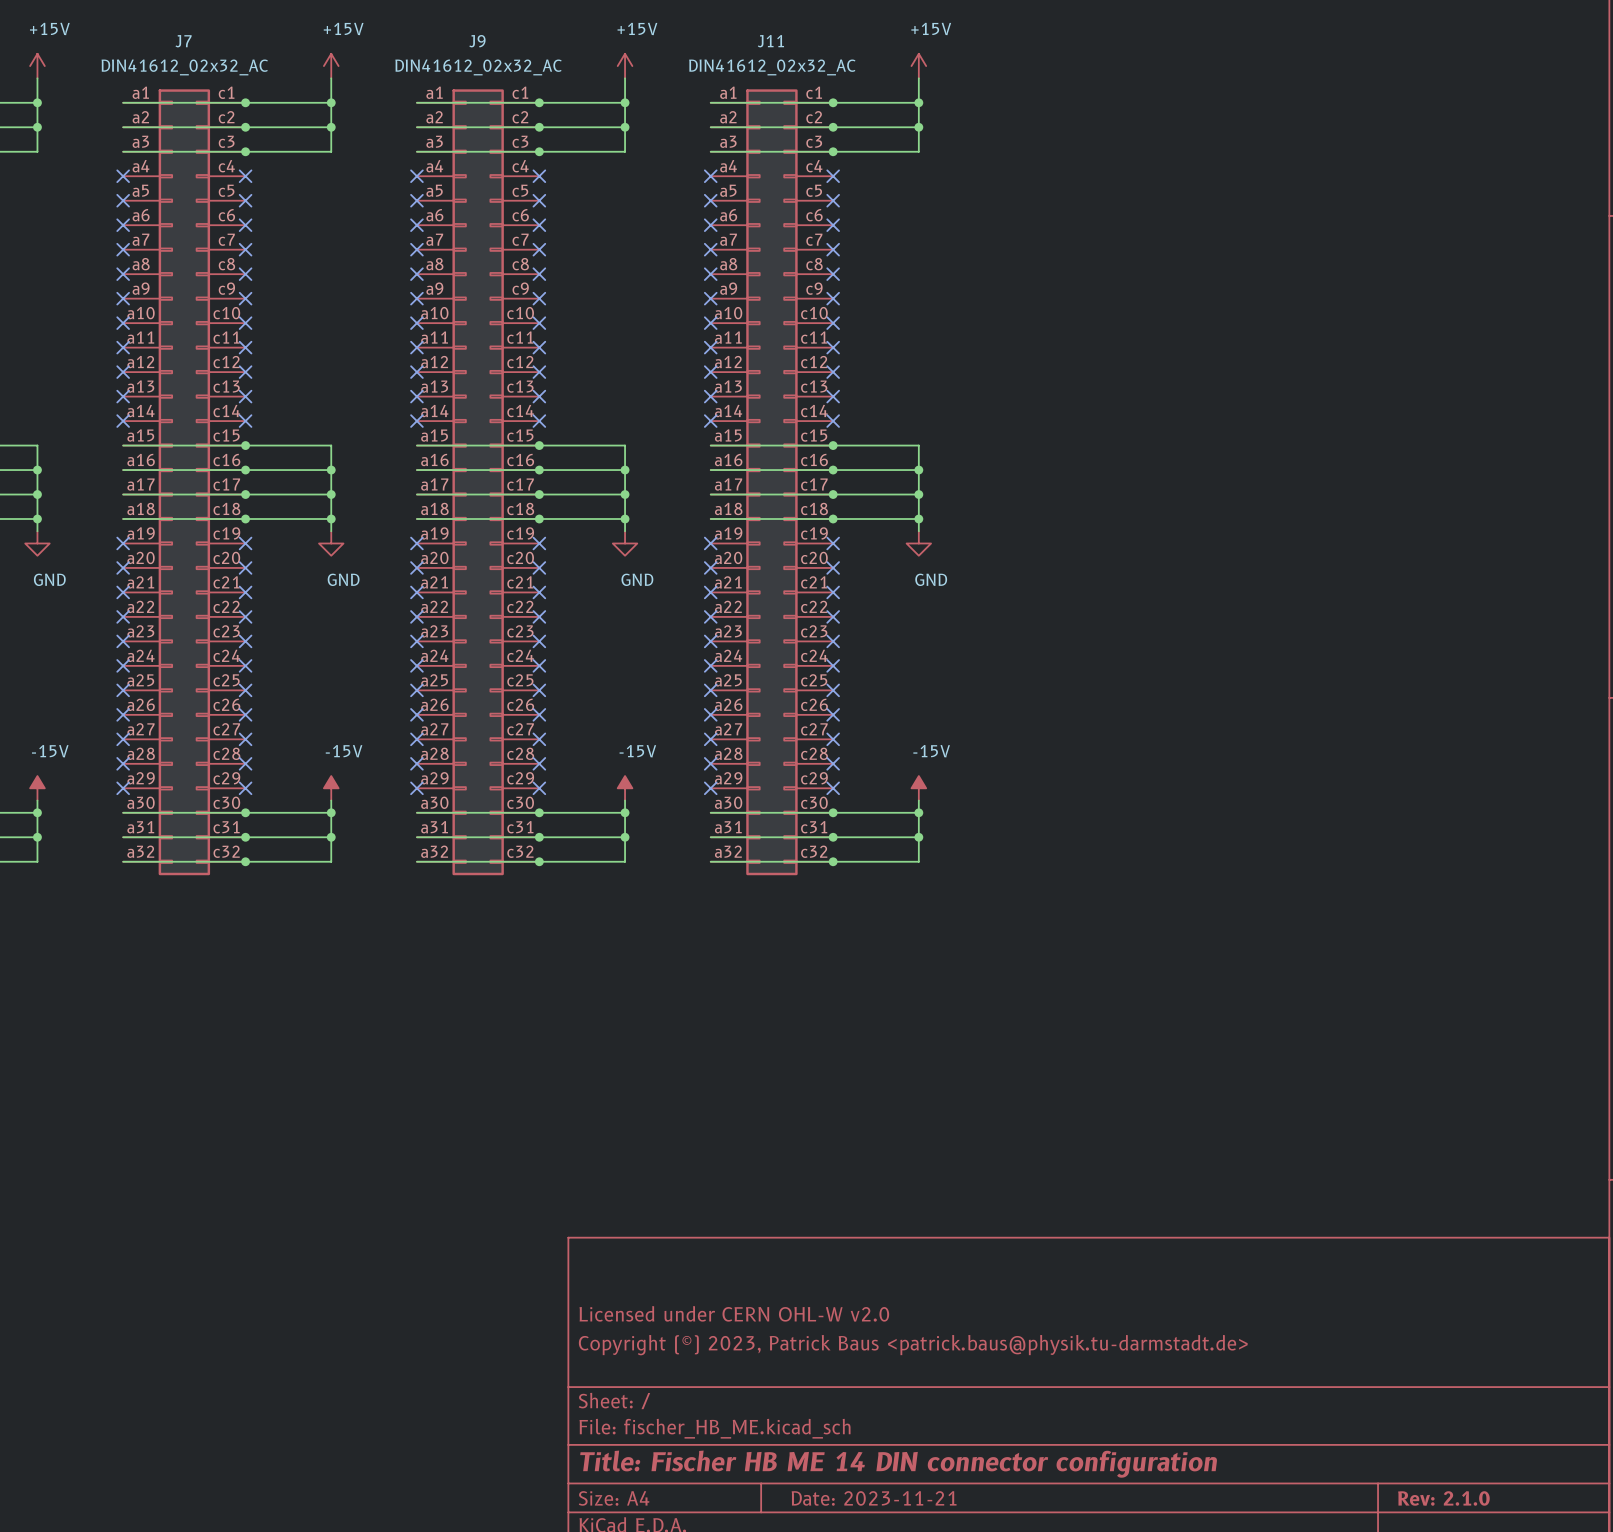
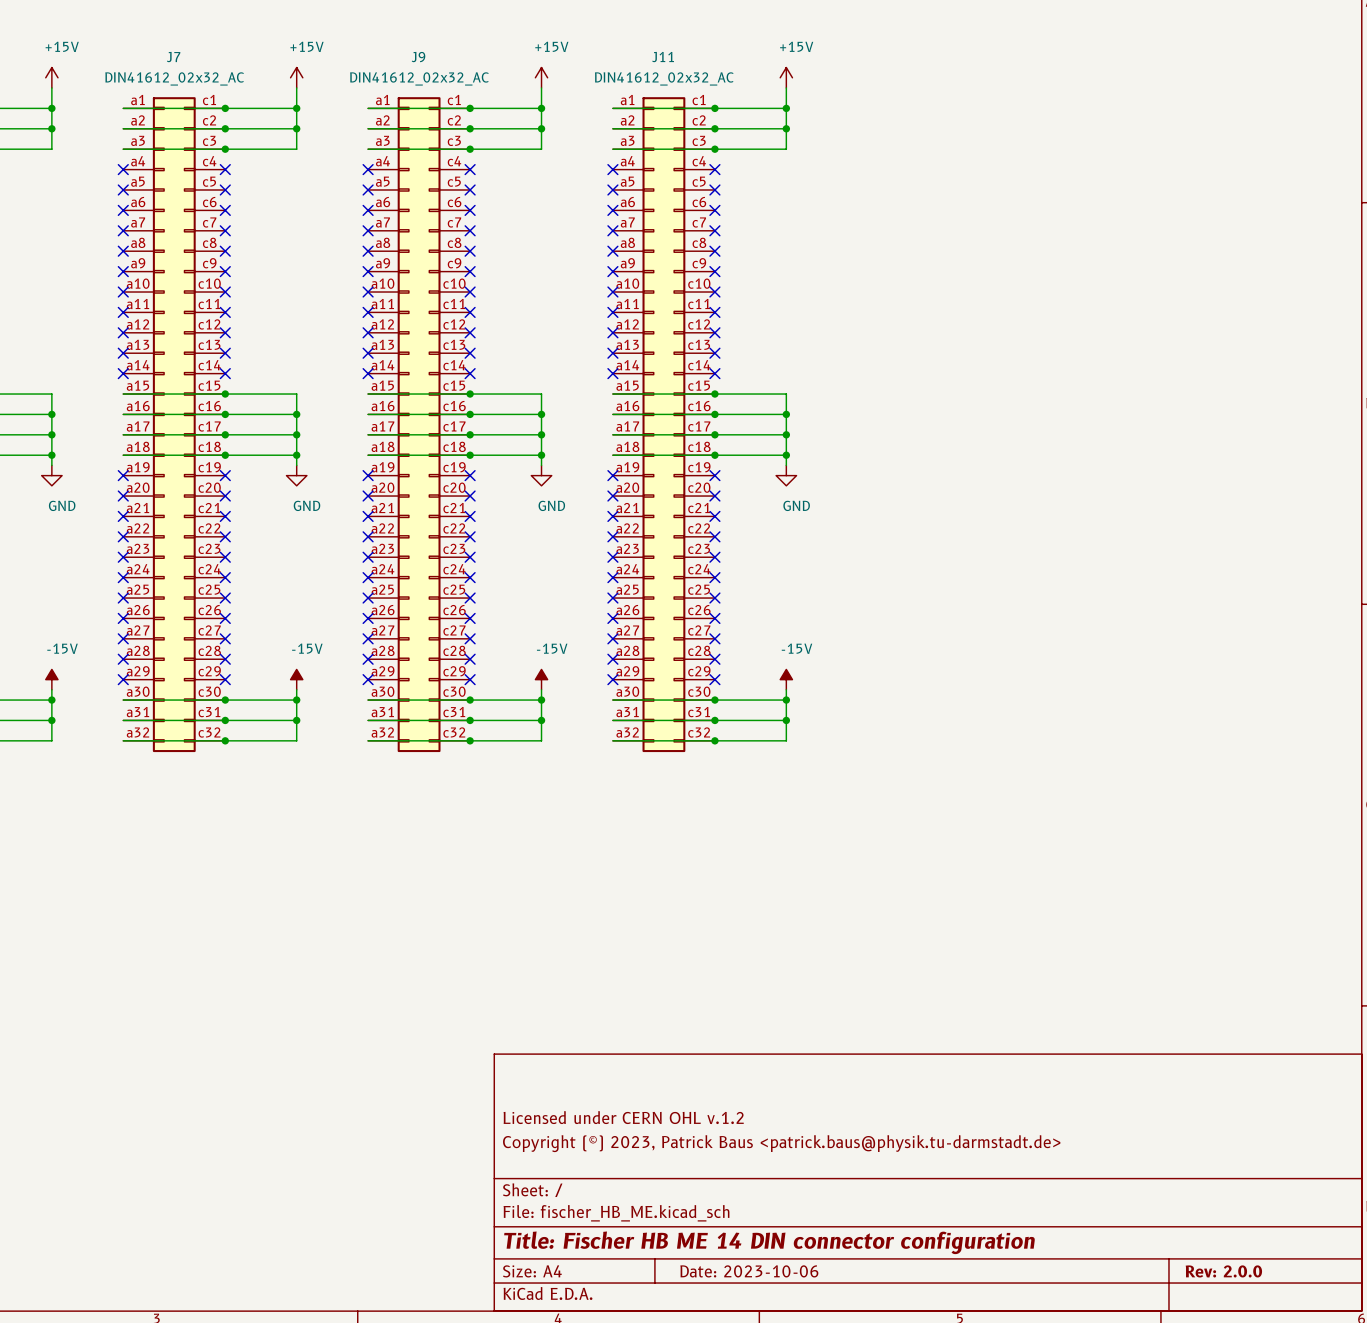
title block: Licensed under CERN OHL-W v2.0 (734, 1313) -> Licensed under CERN OHL v.1.2 (623, 1117)
title block: Date: 2023-11-21 (874, 1498) -> Date: 2023-10-06 (749, 1271)
title block: Rev: 2.1.0 (1443, 1498) -> Rev: 2.0.0 (1223, 1271)

